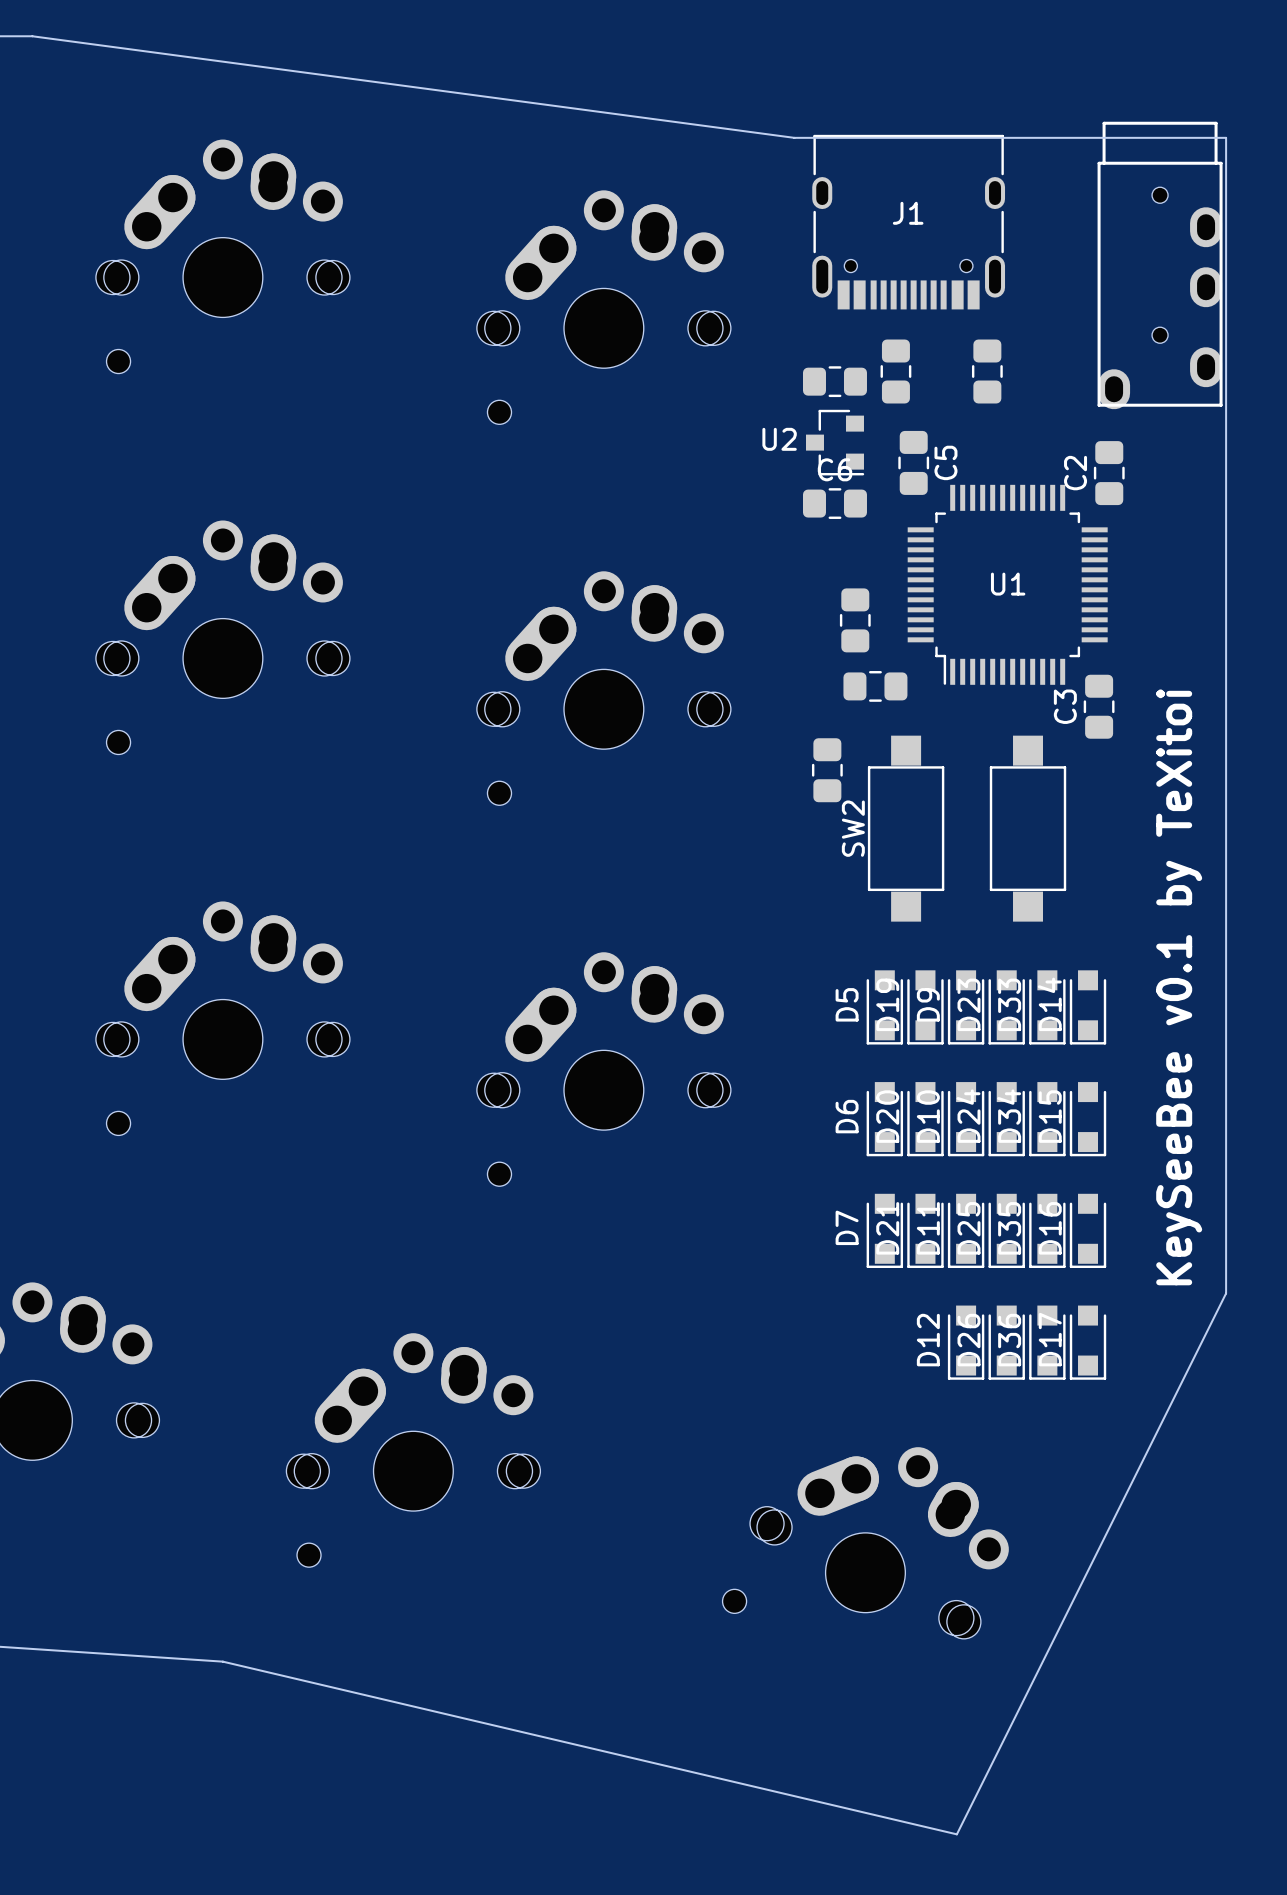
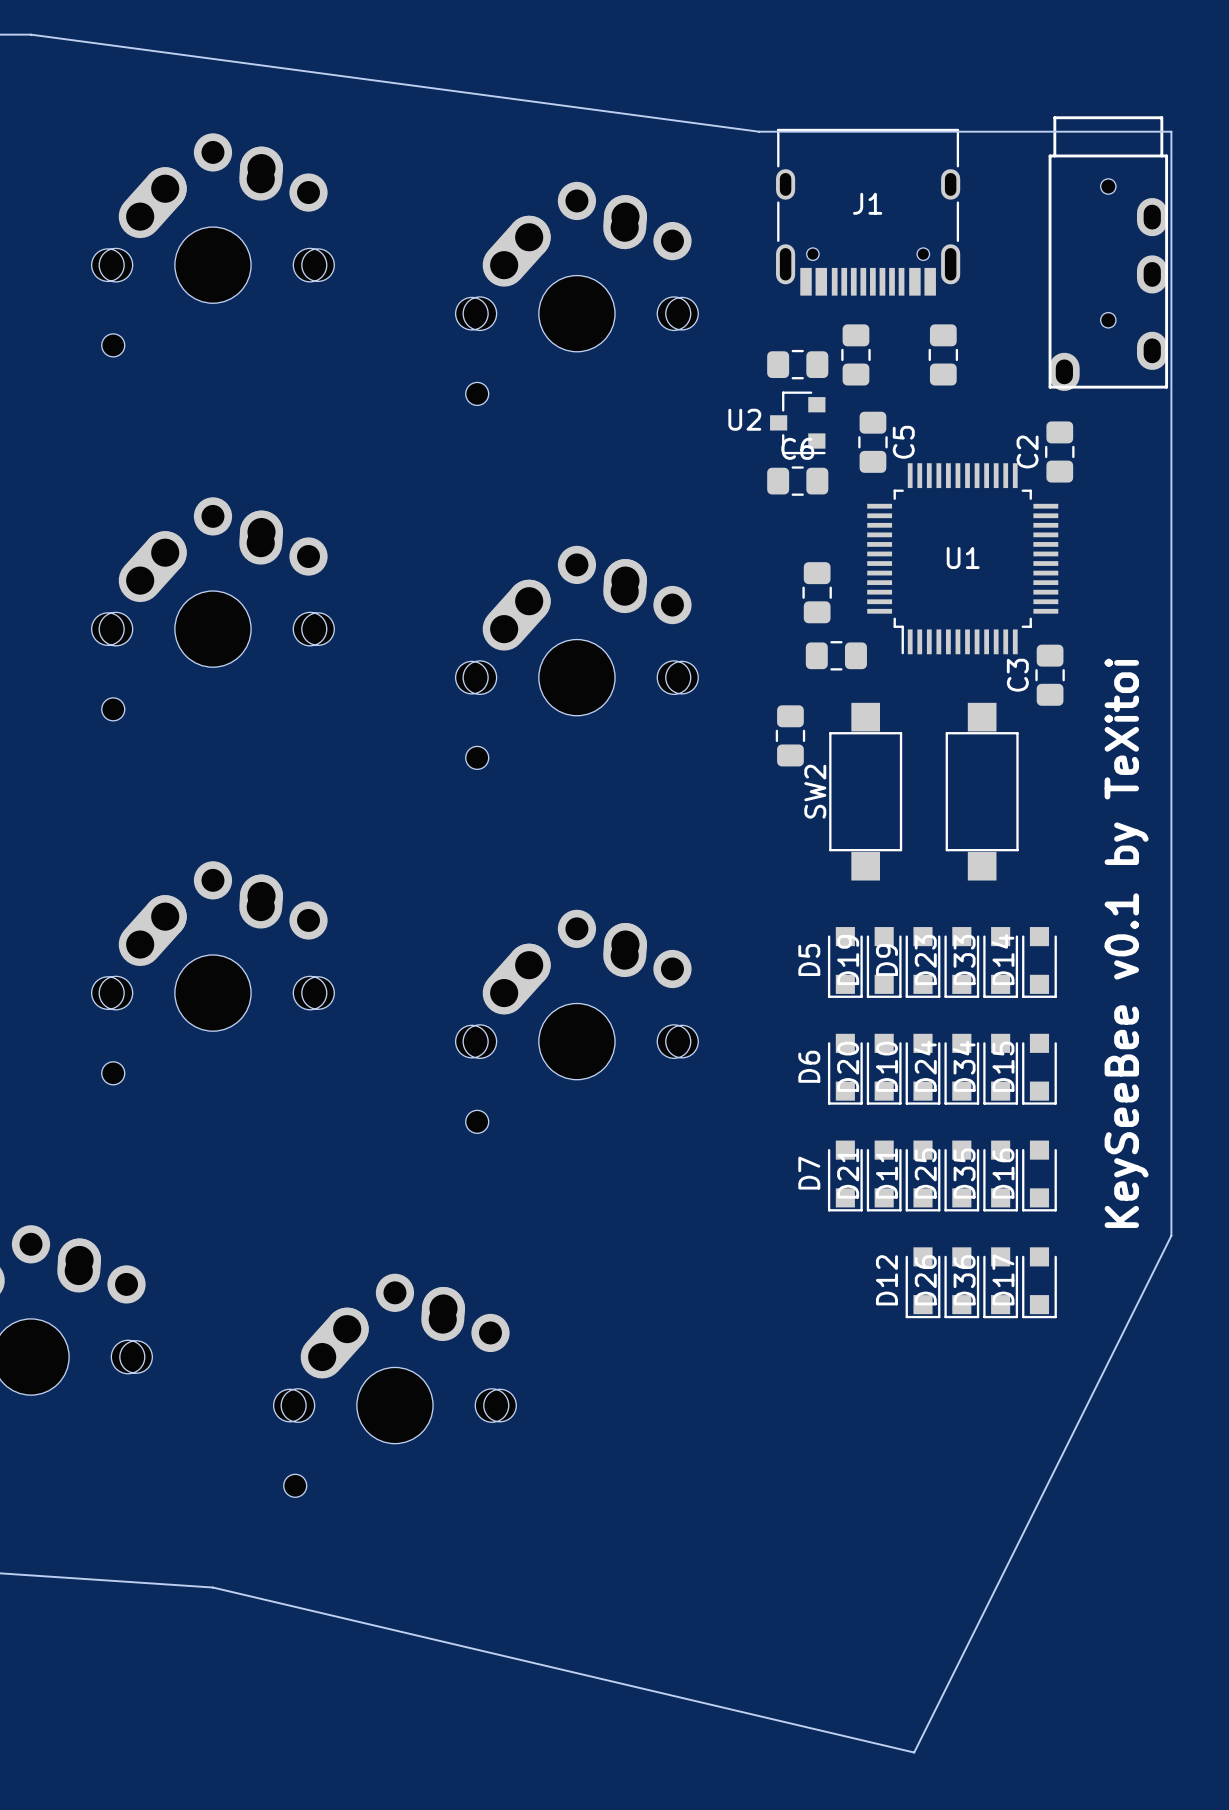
part: (865, 1543) -> none

